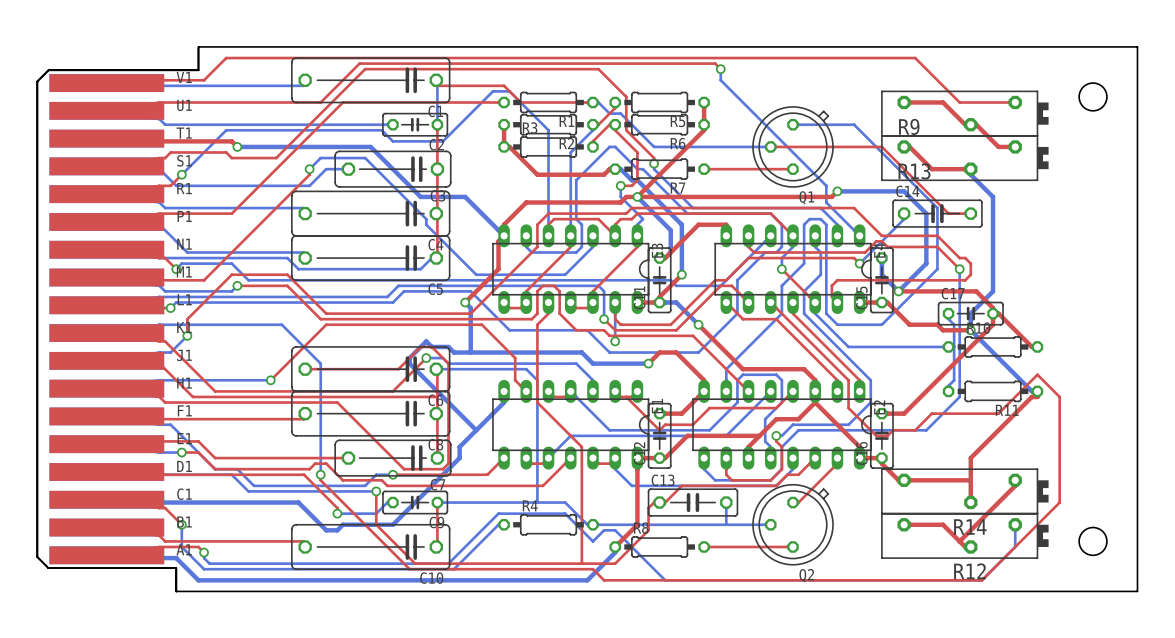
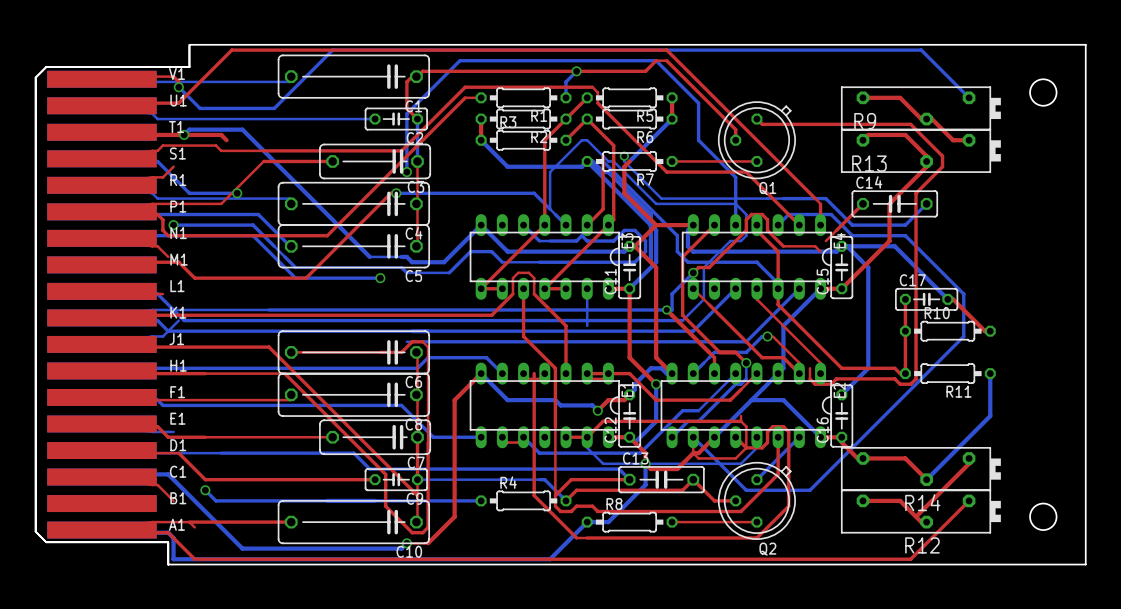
top track: (687, 63) (359, 63) (320, 102) (159, 102) (106, 110) -> (815, 198) (666, 50) (231, 50) (178, 103) (104, 103) (101, 105)
top track: (698, 63) (715, 63) (720, 69) -> (666, 60) (735, 129) (735, 140)
bottom track: (720, 69) (720, 80) (826, 185) (826, 202) (859, 235) -> none
via: (720, 69) -> none
via: none -> (576, 71)
top track: (181, 80) (204, 80) (226, 58) (915, 58) (959, 102) (1015, 102) -> (173, 76) (178, 81) (178, 87)
top track: (436, 80) (437, 85) (504, 85) (520, 102) (592, 102) -> none
bottom track: (436, 80) (437, 124) -> (417, 161) (417, 119)
bottom track: none -> (178, 87) (200, 108) (274, 108) (332, 50) (921, 50) (969, 97)
via: none -> (178, 87)
top track: (620, 91) (598, 69) (365, 69) (276, 158) -> (592, 87) (465, 87) (401, 150) (263, 150)
top track: (487, 102) (342, 102) (276, 169) -> (332, 161) (263, 161)
top track: none -> (465, 97) (327, 235) (168, 235) (162, 230) (162, 219) (157, 214) (104, 214) (101, 211)
bottom track: (592, 102) (598, 102) (609, 113) (620, 113) (654, 146) (770, 146) -> (566, 97) (566, 81) (576, 71)
top track: (615, 102) (615, 108) (598, 124) (592, 124) -> (587, 97) (544, 140) (544, 225) (481, 288) (502, 288)
top track: (626, 108) (626, 130) (654, 158) (654, 163) -> (597, 103) (666, 172) (746, 172) (799, 225)
top track: (437, 124) (437, 169) -> (417, 119) (406, 108) (406, 81) (422, 71) (645, 71) (656, 60)
bottom track: (592, 124) (592, 130) (570, 152) (570, 235) -> none
top track: (704, 124) (704, 130) (637, 196) -> none
bottom track: none -> (672, 119) (629, 161)
top track: none -> (756, 119) (762, 124) (910, 124) (942, 156) (942, 166) (916, 193) (916, 378) (910, 384) (900, 384) (894, 378) (836, 378) (831, 384) (815, 384) (809, 378)
bottom track: (792, 124) (854, 124) (937, 208) (937, 269) (881, 324) (837, 324) (826, 313) (826, 224) (820, 219) (809, 219) (804, 224) (804, 263) (781, 285) (781, 313) (726, 369) (726, 391) -> none
bottom track: none -> (184, 134) (189, 129) (242, 129) (369, 256)
via: none -> (184, 134)
bottom track: (237, 146) (370, 146) (420, 196) (465, 196) (504, 235) -> none
via: (237, 146) -> none
top track: (504, 146) (509, 146) (537, 174) (604, 174) (609, 169) (615, 169) -> none
top track: (592, 146) (592, 141) (609, 124) (615, 124) (615, 130) (637, 152) (637, 180) (631, 185) (620, 185) -> (566, 140) (587, 119) (613, 145) (613, 219) (544, 288) (566, 288)
top track: (770, 146) (881, 146) (948, 213) (970, 213) -> none
top track: (904, 146) (909, 146) (931, 169) (970, 169) -> (862, 140) (868, 134) (905, 134) (926, 156) (926, 166) (889, 203) (889, 241) (841, 288)
top track: none -> (603, 156) (603, 209) (587, 225)
bottom track: (106, 166) (159, 169) (176, 185) (309, 185) (326, 169) (348, 169) -> (101, 158) (104, 156) (131, 156) (136, 161) (157, 161) (189, 193) (237, 193)
top track: (309, 169) (309, 174) (204, 280) (106, 277) -> (396, 193) (390, 193) (306, 278) (194, 278) (178, 262) (104, 262) (101, 264)
bottom track: (309, 169) (320, 158) (365, 158) (426, 219) (426, 224) (476, 274) (526, 274) -> none
via: (309, 169) -> none
bottom track: (970, 169) (970, 174) (993, 196) (993, 291) (970, 313) (970, 330) (1031, 391) (1037, 391) -> (926, 479) (990, 416) (990, 373)
bottom track: (181, 174) (226, 130) (381, 130) (392, 141) (442, 141) (492, 91) (509, 91) (548, 130) (548, 235) -> none
via: (181, 174) -> none
via: none -> (406, 172)
bottom track: (620, 185) (620, 196) (642, 219) (637, 224) (637, 235) -> none
via: (620, 185) -> none
top track: (837, 191) (831, 196) (626, 196) (620, 202) (526, 202) (504, 224) (504, 235) (498, 241) (498, 269) (465, 302) -> none
bottom track: (837, 191) (904, 191) (926, 213) (926, 263) (898, 291) (881, 274) (881, 258) -> none
via: (837, 191) -> none
bottom track: (637, 196) (670, 230) (670, 252) (665, 258) (659, 258) -> none
via: (637, 196) -> none
via: none -> (237, 193)
bottom track: none -> (396, 193) (534, 193) (550, 209)
via: none -> (396, 193)
bottom track: (820, 208) (837, 224) (837, 235) -> (783, 198) (825, 198) (852, 225) (905, 225) (926, 203)
top track: (854, 208) (631, 208) (626, 213) (548, 213) (537, 224) (537, 246) (470, 313) (326, 313) (287, 274) (231, 274) (187, 319) (187, 335) -> none
top track: (859, 213) (881, 235) (937, 235) (959, 258) (965, 258) (970, 263) (970, 274) (965, 280) (837, 280) (831, 285) (831, 296) (837, 302) -> (820, 203) (820, 225)
bottom track: (904, 213) (904, 219) (859, 263) -> none
bottom track: (106, 221) (159, 224) (187, 252) (304, 252) (305, 258) -> (101, 211) (104, 214) (258, 214) (291, 246)
bottom track: (581, 224) (581, 246) (576, 252) -> (555, 214) (566, 225)
via: none -> (173, 225)
bottom track: (526, 235) (526, 246) (531, 252) (565, 252) -> (523, 225) (539, 241)
top track: (548, 235) (548, 224) (554, 219) (598, 219) (615, 235) (615, 224) (620, 219) (631, 219) (637, 213) (770, 213) (792, 235) -> (905, 299) (905, 373) (900, 373) (894, 368) (841, 368) (778, 304) (778, 251) (756, 230) (756, 225)
top track: (570, 235) (570, 246) (526, 291) (526, 302) (520, 308) (509, 308) (504, 302) -> none
bottom track: (592, 235) (592, 246) (565, 274) -> (581, 235) (587, 241) (613, 241) (624, 230) (634, 230) (645, 241) (645, 251) (634, 262) (539, 262)
bottom track: none -> (587, 225) (587, 230) (576, 241) (550, 241)
top track: (637, 235) (637, 246) (592, 291) (592, 302) (587, 308) (576, 308) (570, 302) -> none
top track: (687, 235) (698, 224) (726, 224) (726, 235) -> (629, 161) (624, 166) (624, 193) (656, 225) (693, 225)
bottom track: none -> (693, 225) (687, 230) (687, 246) (693, 251) (836, 251) (841, 246) (894, 246) (947, 299)
top track: (748, 235) (748, 246) (754, 252) (865, 252) -> (714, 225) (682, 256) (682, 315) (719, 352)
bottom track: (770, 235) (720, 285) (676, 285) (670, 280) (420, 280) -> (735, 225) (735, 177) (698, 140) (698, 103) (656, 60) (459, 60) (406, 113) (406, 172)
bottom track: (792, 235) (792, 246) (781, 258) (781, 269) -> none
bottom track: (815, 235) (815, 246) (820, 252) (820, 274) (804, 291) (804, 313) (870, 380) (870, 402) (848, 424) (792, 424) (781, 435) (776, 435) -> (778, 225) (788, 214) (831, 214) (852, 235) (905, 235) (963, 294) (963, 336) (809, 490) (746, 490) (693, 437)
top track: (876, 241) (881, 241) (887, 246) (937, 246) (959, 269) -> (836, 230) (862, 203)
bottom track: (106, 249) (159, 258) (287, 258) -> (173, 225) (253, 225) (274, 246)
bottom track: none -> (101, 238) (104, 235) (253, 235) (295, 278) (380, 278)
bottom track: (436, 258) (431, 258) (420, 269) -> (629, 246) (624, 251) (507, 251) (481, 225) (444, 262) (412, 262) (406, 256) (401, 256)
top track: none -> (634, 246) (656, 267) (656, 357) (672, 373)
top track: (820, 258) (748, 258) (726, 280) (715, 280) (670, 324) (620, 324) (615, 319) (615, 302) -> (783, 246) (767, 230) (767, 219) (762, 214) (751, 214) (746, 219) (746, 230) (709, 267) (698, 267) (693, 272)
bottom track: none -> (847, 246) (868, 267) (868, 368) (841, 394)
via: (859, 263) -> none
bottom track: (176, 269) (181, 263) (231, 263) (248, 280) (309, 280) -> none
via: (176, 269) -> none
bottom track: (298, 269) (387, 269) -> (284, 256) (295, 267)
top track: (781, 269) (815, 302) -> none
via: (781, 269) -> none
bottom track: (959, 269) (959, 396) (926, 430) (798, 430) (781, 446) (781, 469) (770, 480) (715, 480) (704, 469) (704, 458) -> none
via: (959, 269) -> none
top track: (681, 274) (659, 296) (659, 302) -> (656, 384) (629, 357) (629, 288)
via: (681, 274) -> none
bottom track: (106, 277) (159, 285) (165, 291) (231, 291) (237, 285) -> none
top track: (237, 285) (287, 285) (320, 319) (531, 319) (537, 313) (537, 308) -> (101, 317) (104, 315) (491, 315) (512, 294)
via: (237, 285) -> none
bottom track: (426, 285) (398, 285) (387, 296) (159, 296) (106, 305) -> (406, 272) (401, 267)
bottom track: (470, 285) (598, 285) (604, 291) (604, 319) -> (449, 272) (470, 251) (491, 251) (502, 262)
via: none -> (693, 272)
via: none -> (380, 278)
top track: (898, 291) (976, 291) (993, 308) (993, 324) (904, 413) (881, 413) -> none
via: (898, 291) -> none
bottom track: (465, 302) (470, 308) (470, 352) -> none
via: (465, 302) -> none
bottom track: (659, 302) (676, 302) (698, 324) -> (629, 288) (656, 262) (656, 230) (587, 161) (581, 166) (507, 166) (481, 140)
top track: (748, 302) (731, 285) (720, 285) (676, 330) (615, 330) (604, 319) -> none
top track: (770, 302) (848, 380) (848, 385) -> none
bottom track: (815, 302) (815, 313) (848, 346) (954, 346) -> (778, 288) (778, 283) (756, 262) (687, 262) (677, 251) (677, 235) (603, 161) (603, 156)
bottom track: none -> (820, 288) (783, 325) (783, 368) (714, 437)
top track: (881, 302) (887, 302) (909, 324) (937, 324) (943, 330) (970, 330) -> none
bottom track: (170, 308) (176, 302) (392, 302) (404, 291) (470, 291) (509, 330) (587, 330) (609, 352) (698, 352) (715, 335) -> (101, 291) (104, 294) (157, 294) (184, 320) (682, 320)
via: (170, 308) -> none
top track: (559, 308) (559, 313) (576, 330) (604, 330) (609, 335) (692, 335) (748, 391) -> (534, 294) (566, 325) (566, 373)
top track: (548, 313) (537, 324) (537, 402) (581, 446) -> (523, 299) (523, 336) (555, 368) (555, 426)
bottom track: (948, 313) (948, 319) (954, 324) (954, 380) (948, 385) (948, 391) -> none
via: (604, 319) -> none
top track: (742, 319) (776, 319) (809, 352) -> (709, 304) (762, 357) (783, 357) (799, 373)
bottom track: (281, 324) (320, 363) (320, 474) -> (269, 309) (672, 309) (672, 294) (693, 272)
via: (970, 330) -> none
top track: (106, 333) (165, 341) (215, 391) -> (101, 370) (104, 373) (205, 373)
via: (187, 335) -> none
via: (615, 341) -> none
bottom track: (431, 346) (426, 341) (409, 358) (409, 363) (476, 430) -> (412, 331) (168, 331) (157, 320) (104, 320) (101, 317)
bottom track: (448, 346) (454, 352) (581, 352) (592, 363) (648, 363) -> (428, 331) (693, 331) (735, 288)
via: none -> (767, 336)
top track: (426, 358) (392, 391) (298, 391) -> (428, 442) (428, 527) (422, 532) (412, 532) (385, 506) (385, 474) (284, 373)
via: (426, 358) -> none
top track: (442, 358) (431, 346) (420, 346) (398, 369) -> (422, 341) (412, 341) (401, 352) (380, 352)
bottom track: (442, 358) (448, 363) (576, 363) (592, 380) (592, 391) -> (422, 341) (746, 341) (799, 288)
top track: (106, 360) (159, 363) (192, 396) (437, 396) -> (101, 344) (104, 347) (269, 347) (417, 495)
top track: (648, 363) (659, 352) (676, 352) (704, 380) (704, 391) (681, 413) (659, 413) -> (597, 410) (608, 400) (624, 400) (629, 394)
via: (648, 363) -> none
bottom track: (436, 369) (526, 369) (537, 380) (537, 502) -> none
top track: (742, 369) (754, 369) -> (709, 352) (714, 357) (714, 373)
top track: (770, 369) (804, 369) (815, 380) (815, 402) -> (735, 352) (746, 363)
bottom track: (742, 374) (776, 374) (781, 380) -> (709, 357) (714, 352) (746, 352) (762, 336) (767, 336)
top track: (270, 380) (326, 324) (481, 324) (515, 358) (515, 380) (526, 391) -> none
bottom track: (270, 380) (159, 380) (106, 388) -> (502, 373) (486, 357) (428, 357) (417, 368) (104, 368) (101, 370)
via: (270, 380) -> none
bottom track: (737, 380) (737, 402) (709, 430) (609, 430) (570, 391) -> (703, 363) (693, 373)
via: none -> (746, 363)
top track: (106, 388) (159, 396) (165, 402) (337, 402) (404, 469) (442, 469) (448, 463) -> none
bottom track: (504, 391) (504, 402) (459, 446) (459, 458) (392, 524) -> (475, 500) (375, 500)
bottom track: none -> (481, 373) (507, 400) (555, 400) (560, 405) (592, 405) (597, 410)
bottom track: none -> (672, 373) (666, 373) (661, 368) (650, 368) (634, 384) (634, 389) (629, 394)
top track: (1037, 391) (1037, 396) (1031, 396) (970, 458) (970, 502) -> none
top track: (626, 396) (659, 430) (665, 424) (692, 424) (709, 408) (776, 408) -> (587, 373) (629, 373) (656, 400) (730, 400) (741, 389)
bottom track: (781, 396) (781, 402) (765, 419) (765, 441) (770, 446) (770, 458) -> (746, 378) (741, 384) (735, 384) (698, 421) (687, 421) (672, 437)
top track: (848, 396) (848, 408) (876, 435) (887, 435) (893, 430) (915, 430) (931, 413) (998, 413) (1037, 374) (1059, 396) (1059, 502) (981, 580) (604, 580) (592, 569) (448, 569) -> (481, 373) (454, 400) (454, 516) (428, 543)
bottom track: none -> (656, 384) (656, 421) (634, 442) (629, 437)
via: none -> (656, 384)
top track: (815, 402) (798, 419) (776, 419) (748, 446) (748, 458) -> none
top track: (815, 402) (859, 446) (859, 458) -> none
bottom track: (106, 416) (170, 424) (215, 469) (237, 469) (254, 485) (365, 485) (376, 474) (392, 474) -> (101, 397) (104, 400) (157, 400) (162, 405) (401, 405) (433, 437) (481, 437)
bottom track: none -> (751, 400) (783, 400) (820, 437)
via: none -> (597, 410)
bottom track: (731, 430) (726, 435) (570, 435) (548, 458) -> (698, 410) (682, 410) (640, 453) (539, 453) (523, 437)
top track: (759, 435) (687, 435) (665, 458) (659, 458) -> (714, 437) (698, 453) (693, 453) (677, 469) (650, 469) (645, 463) (645, 453) (629, 437)
via: (776, 435) -> none
top track: (106, 444) (198, 441) (215, 458) -> (101, 423) (104, 426) (157, 426) (168, 437) (205, 437)
top track: (181, 452) (198, 452) (215, 469) (309, 469) (315, 463) (326, 463) (342, 480) (381, 480) (387, 485) (542, 485) (570, 458) -> none
via: (181, 452) -> none
top track: none -> (417, 437) (417, 479)
top track: (504, 458) (487, 474) (392, 474) -> none
top track: (592, 458) (598, 463) (609, 463) (615, 458) -> (566, 437) (587, 437) (603, 421) (741, 421)
top track: (637, 458) (637, 524) (615, 546) -> none
top track: none -> (735, 437) (746, 447) (762, 447) (767, 442) (767, 431) (772, 426) (783, 426) (788, 431) (788, 506) (756, 538) (587, 538)
top track: (815, 458) (798, 474) (787, 474) (776, 485) (681, 485) (665, 502) (659, 502) -> (778, 437) (778, 474) (741, 511) (597, 511) (592, 506) (576, 506) (571, 511) (560, 511) (555, 506)
top track: (837, 458) (837, 463) (798, 502) (792, 502) -> none
bottom track: none -> (799, 437) (756, 479)
top track: (187, 474) (304, 474) (337, 508) (337, 513) -> (178, 453) (205, 479) (375, 479)
bottom track: (231, 474) (248, 491) (376, 491) -> (221, 453) (353, 453) (369, 469) (619, 469) (629, 479)
top track: (320, 474) (320, 480) (409, 569) (426, 569) -> none
via: (320, 474) -> none
via: (392, 474) -> none
top track: (948, 480) (970, 480) -> (905, 458) (926, 479)
via: none -> (645, 463)
top track: (376, 491) (376, 524) (415, 563) (604, 563) -> (534, 373) (534, 495) (576, 538)
via: (376, 491) -> none
bottom track: (106, 499) (159, 502) (298, 502) (326, 530) (337, 530) (342, 524) -> (101, 477) (104, 474) (168, 474) (242, 548) (401, 548) (406, 543)
bottom track: (392, 502) (387, 502) (376, 513) (337, 513) -> none
bottom track: (565, 502) (587, 524) (770, 524) -> (539, 479) (544, 479) (566, 500)
top track: (654, 502) (648, 508) (648, 530) (615, 563) -> (624, 479) (571, 479) (555, 495)
bottom track: (726, 502) (726, 524) -> none
bottom track: none -> (205, 490) (215, 500) (327, 500)
via: none -> (205, 490)
via: (337, 513) -> none
bottom track: (181, 524) (181, 546) (204, 569) (454, 569) (498, 524) -> none
via: (181, 524) -> none
top track: none -> (566, 500) (576, 490) (682, 490) (693, 479) (714, 500) (735, 500)
top track: none -> (969, 500) (910, 559) (194, 559) (168, 532) (104, 532) (101, 530)
bottom track: (1015, 524) (1015, 546) (981, 580) (665, 580) (615, 530) (604, 530) (592, 541) (565, 513) (498, 513) (448, 563) (209, 563) (204, 558) (204, 552) -> none
top track: (106, 527) (159, 535) (165, 541) (304, 541) (305, 546) -> (189, 522) (291, 522)
top track: (581, 530) (581, 563) -> none
bottom track: (615, 546) (615, 552) (587, 580) (198, 580) (181, 563) -> (645, 463) (645, 484) (608, 522) (587, 522) (550, 559) (173, 559) (173, 538)
via: (204, 552) -> none
via: none -> (406, 543)

